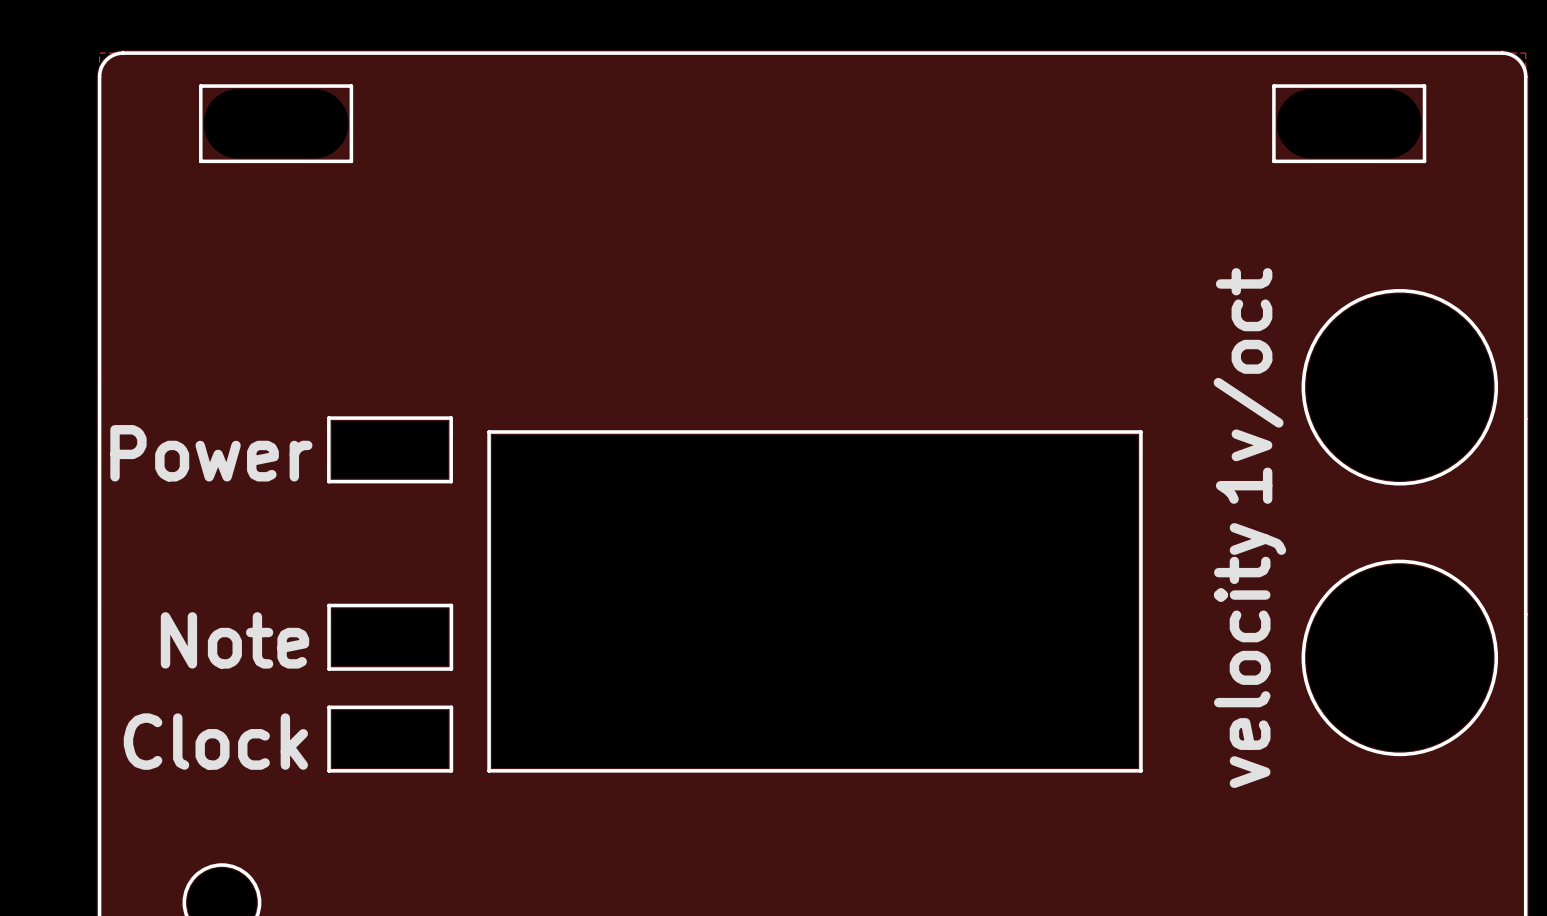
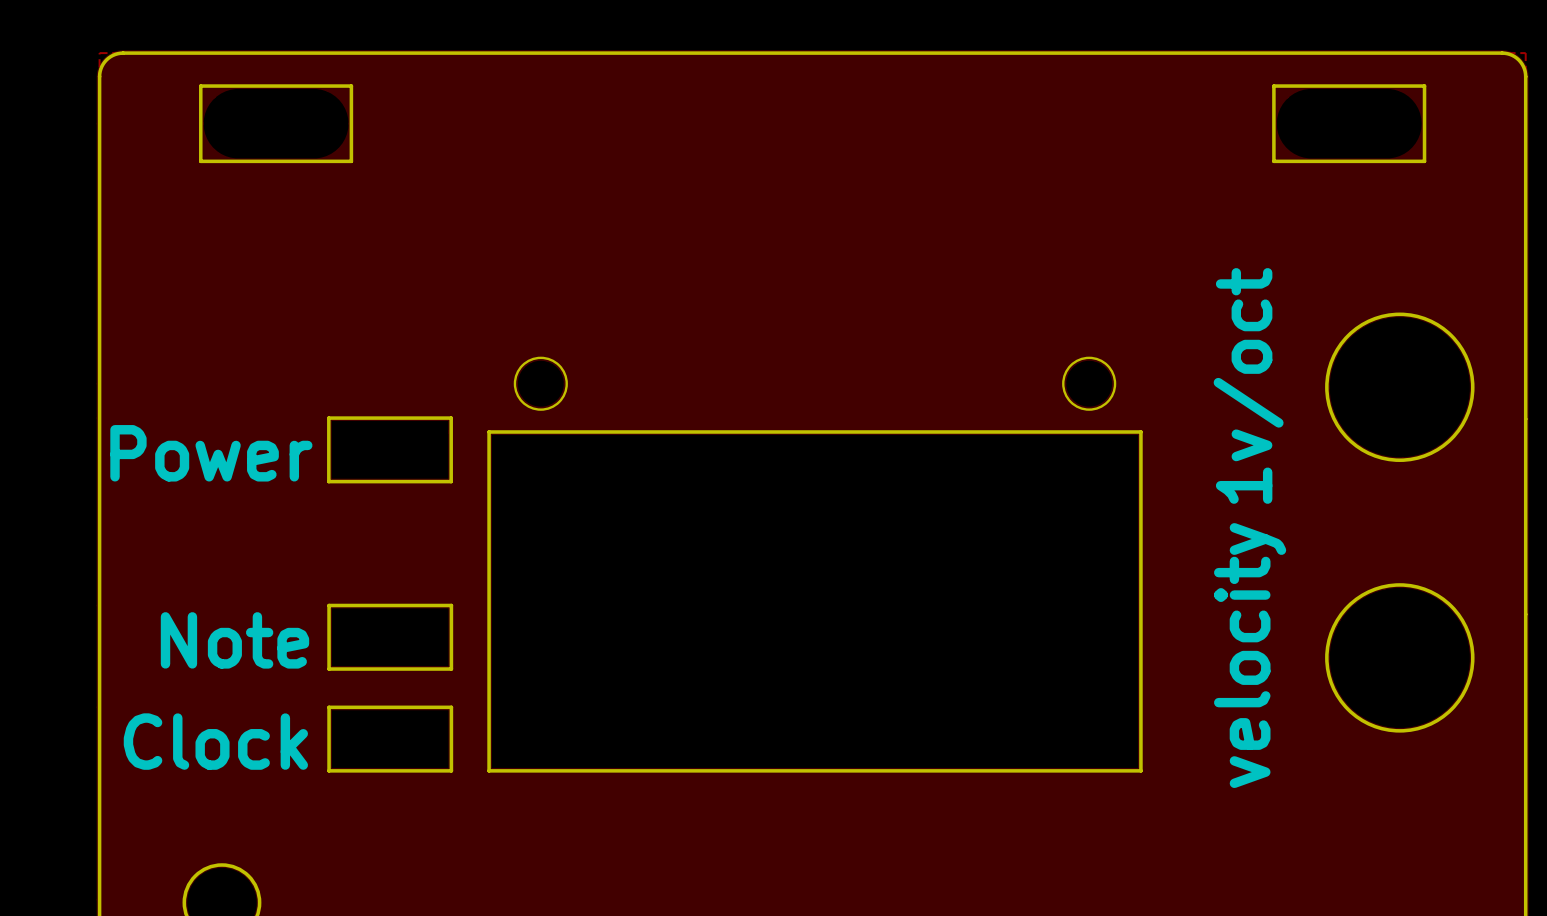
round board edge size: [1301, 289, 1499, 486] -> [1325, 312, 1475, 462]
round board edge: none -> [513, 356, 568, 411]
round board edge: none -> [1062, 356, 1117, 411]
round board edge size: [1301, 559, 1499, 757] -> [1325, 583, 1475, 733]

